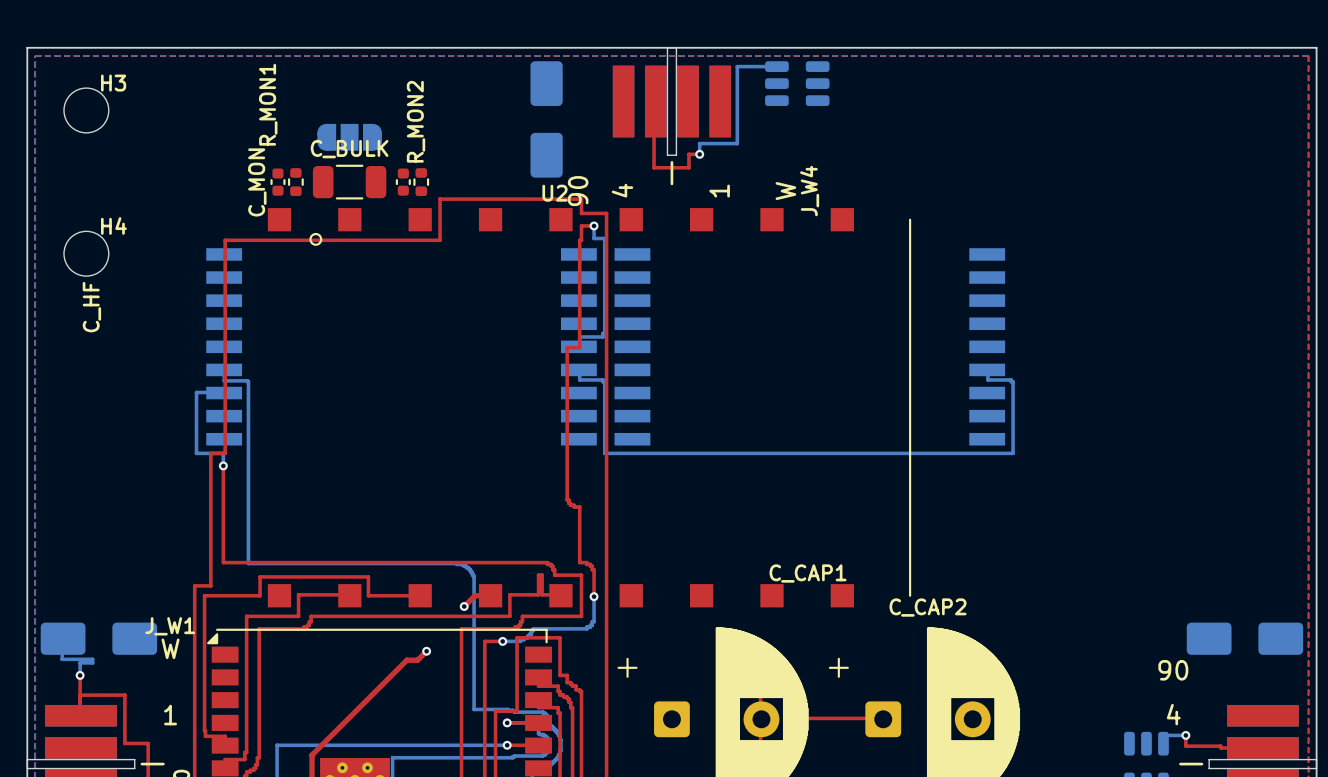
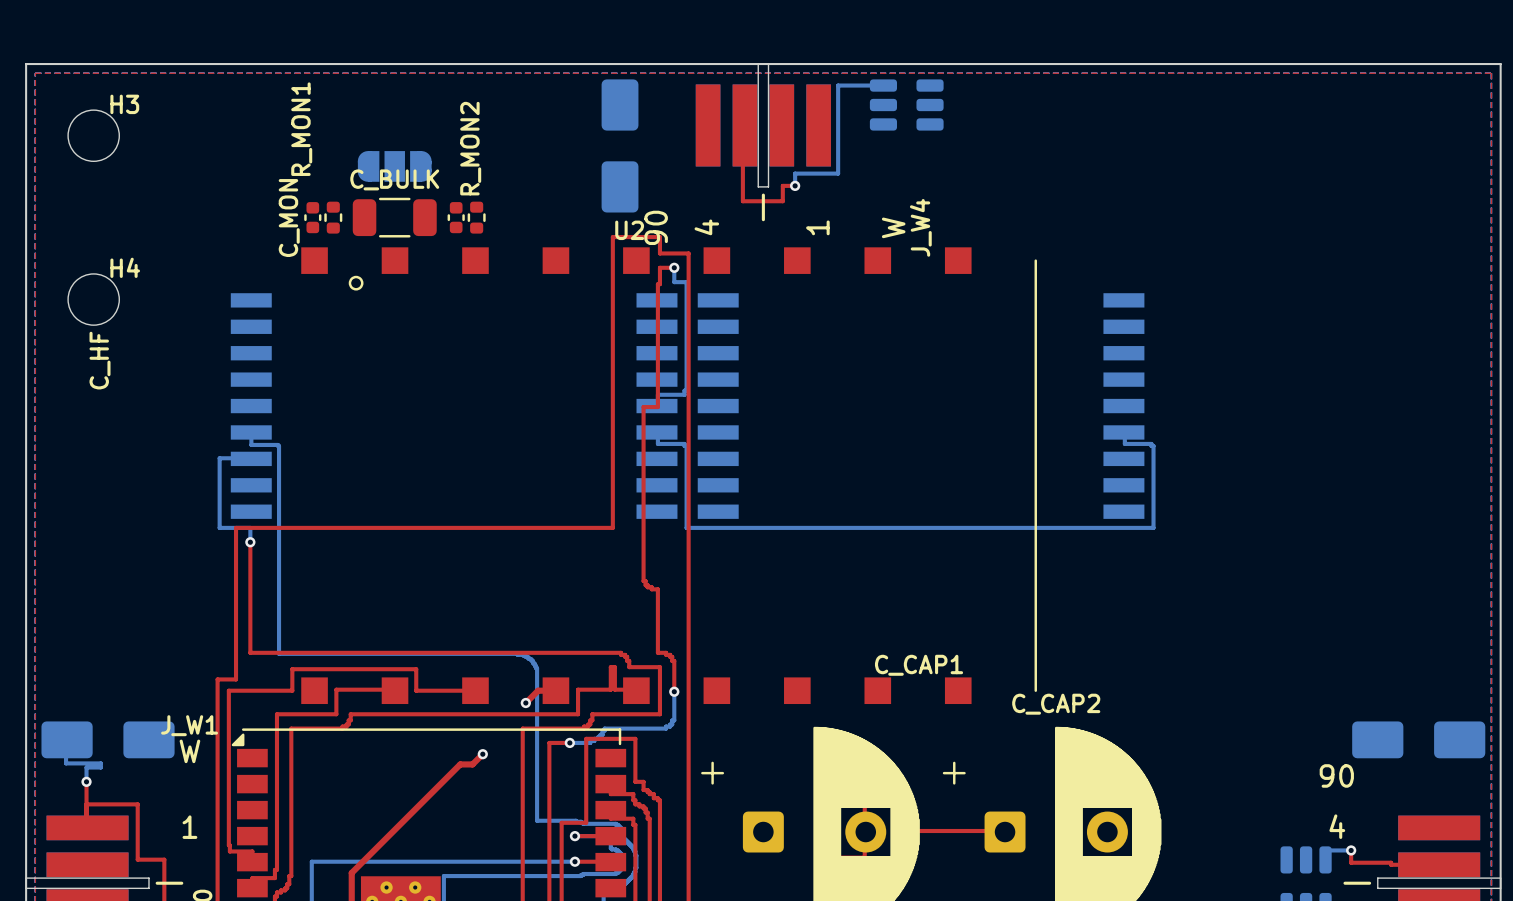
top track: (540, 199) (440, 199) (440, 240) (225, 240) (225, 453) -> (612, 237) (612, 527) (252, 527)

